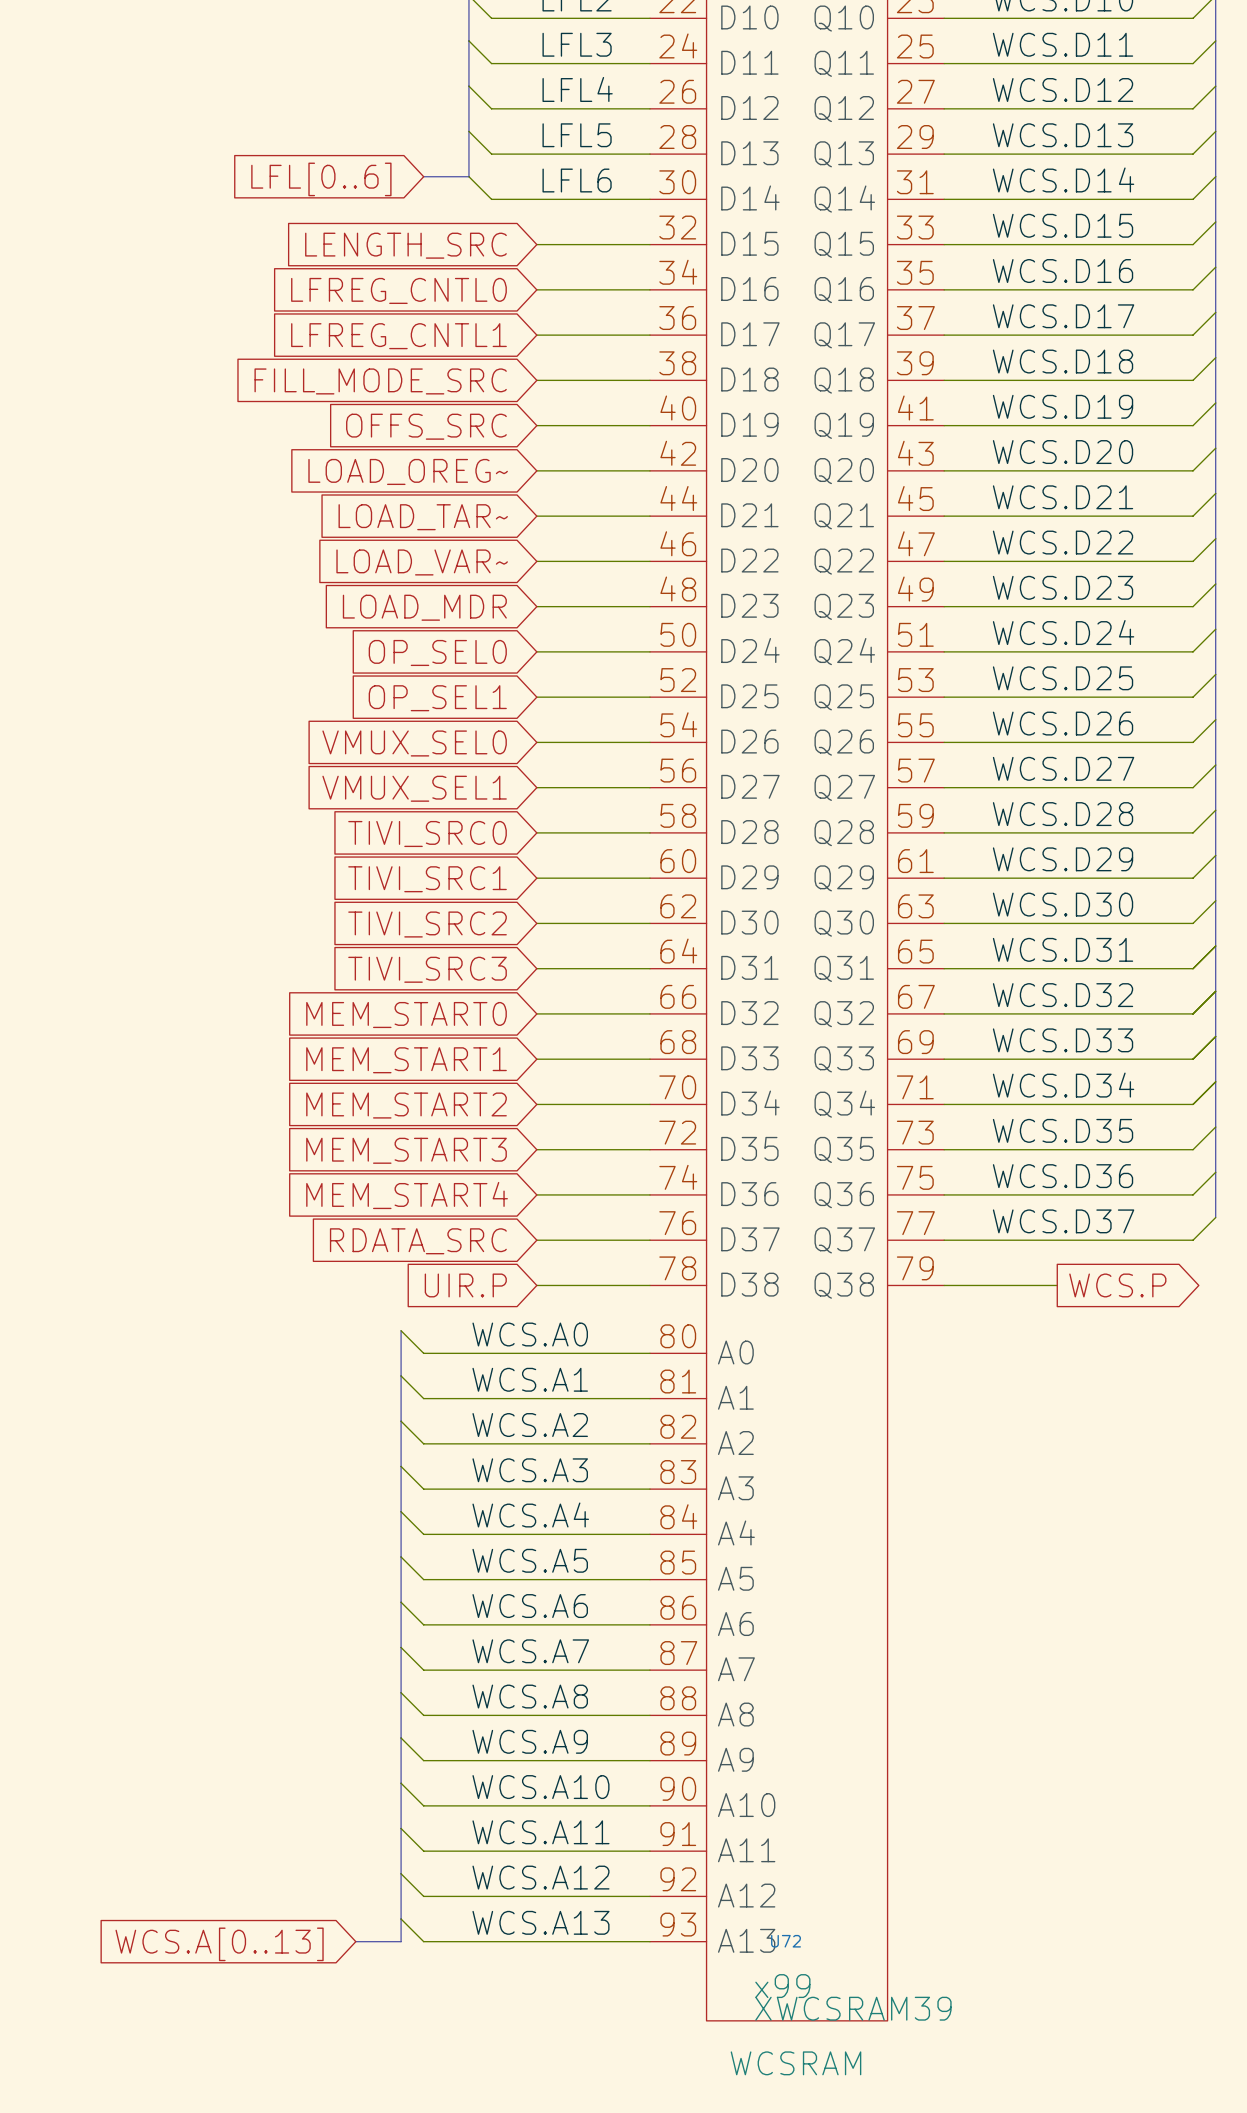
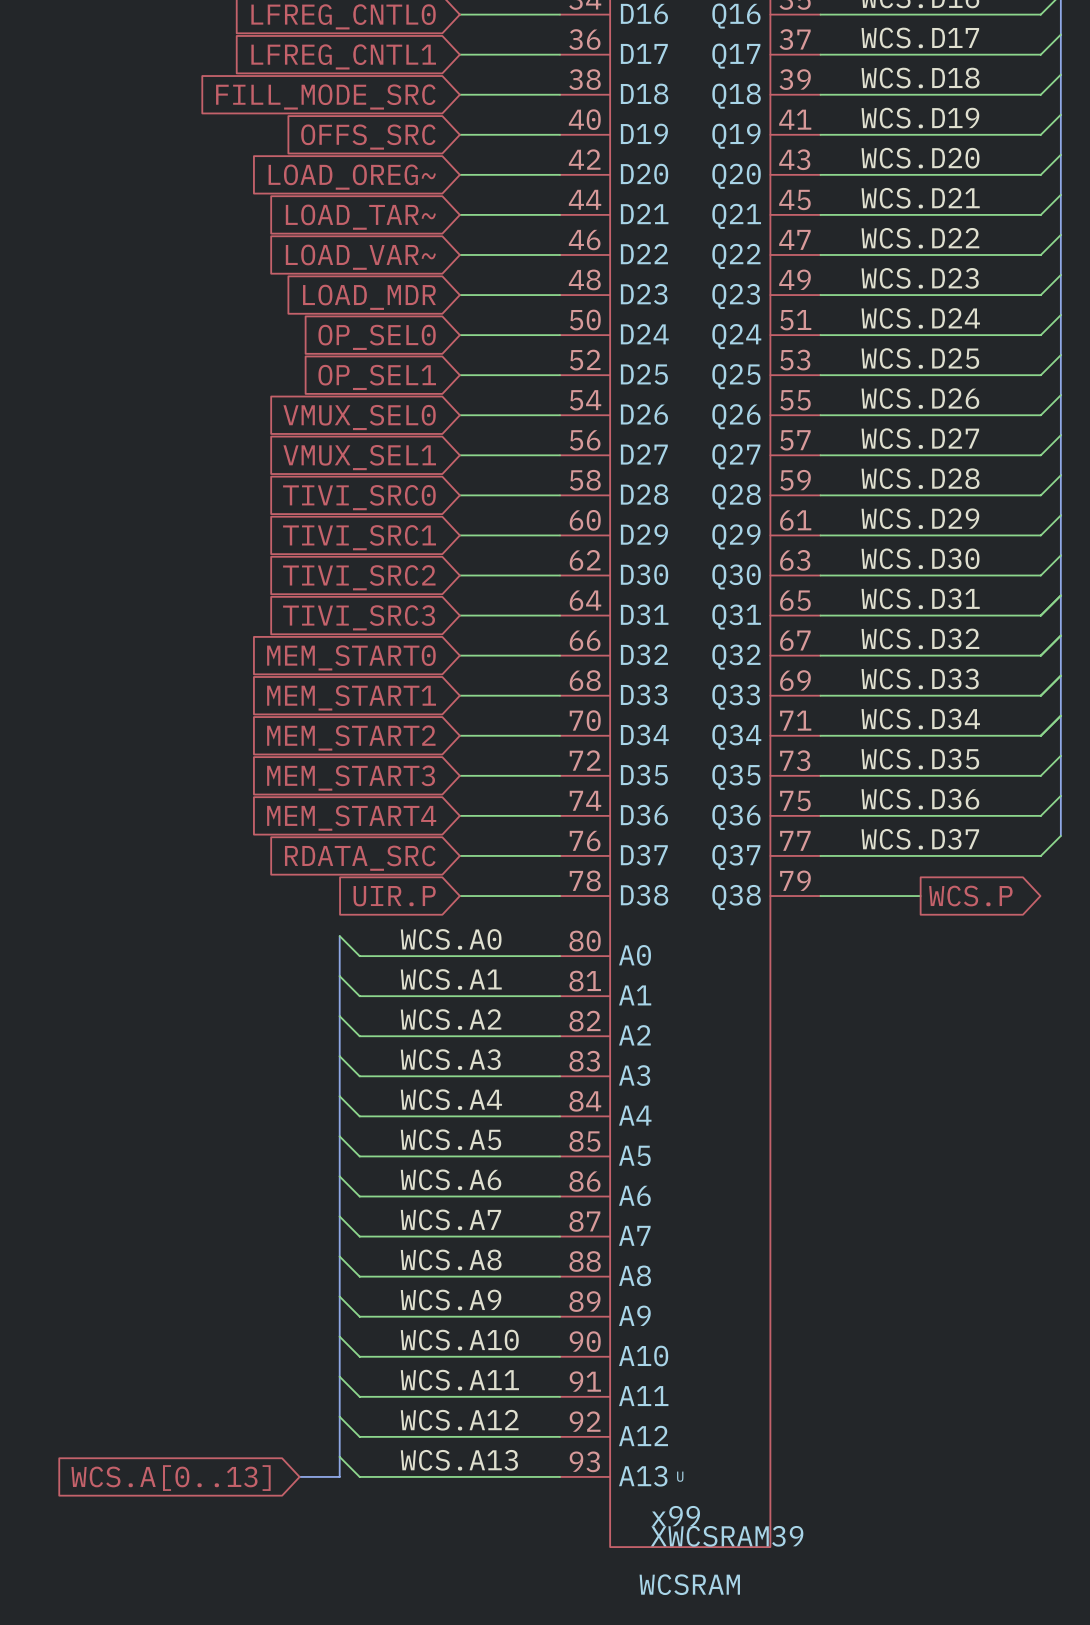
U72 name: U72 (786, 1941) -> U (680, 1476)

